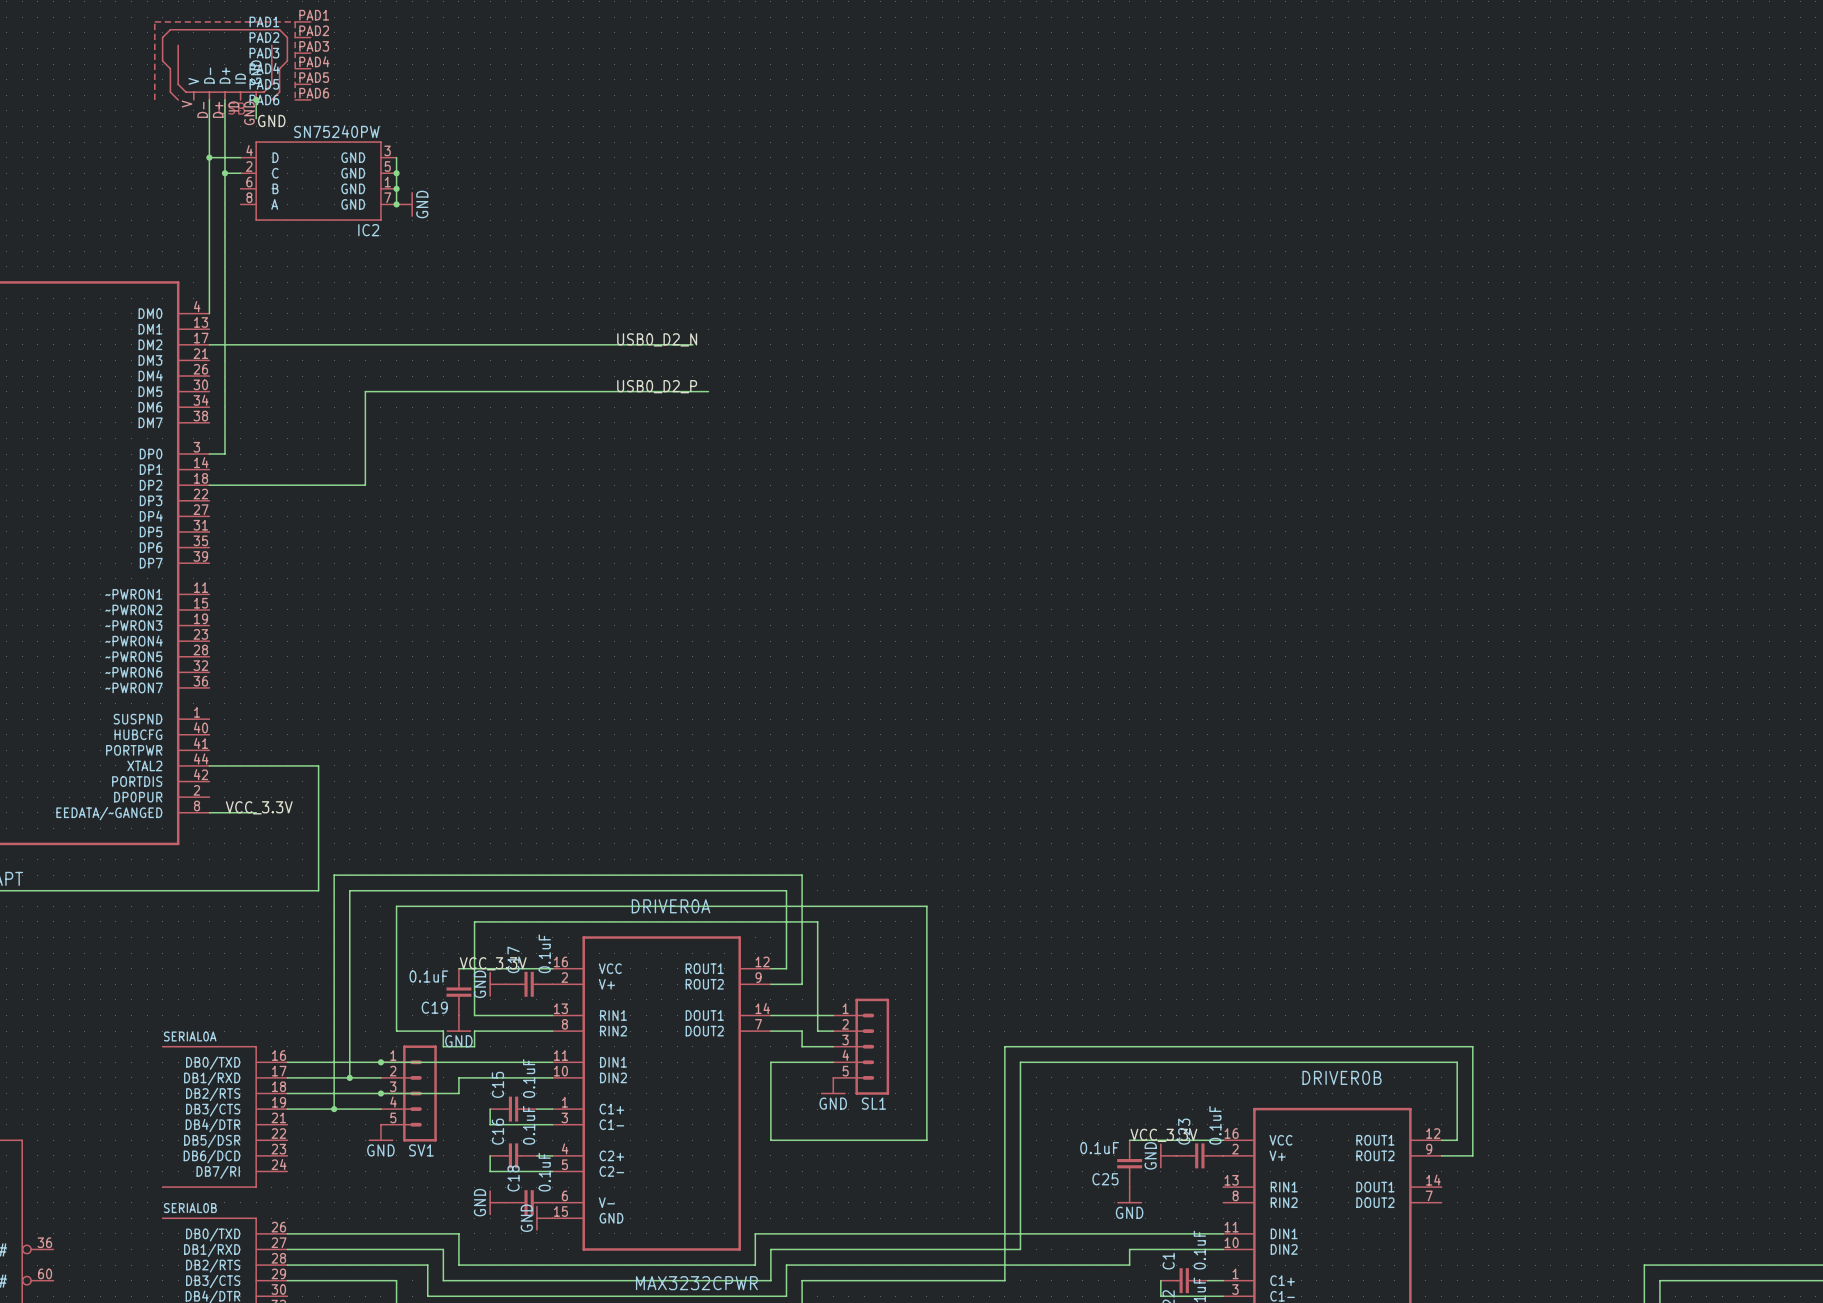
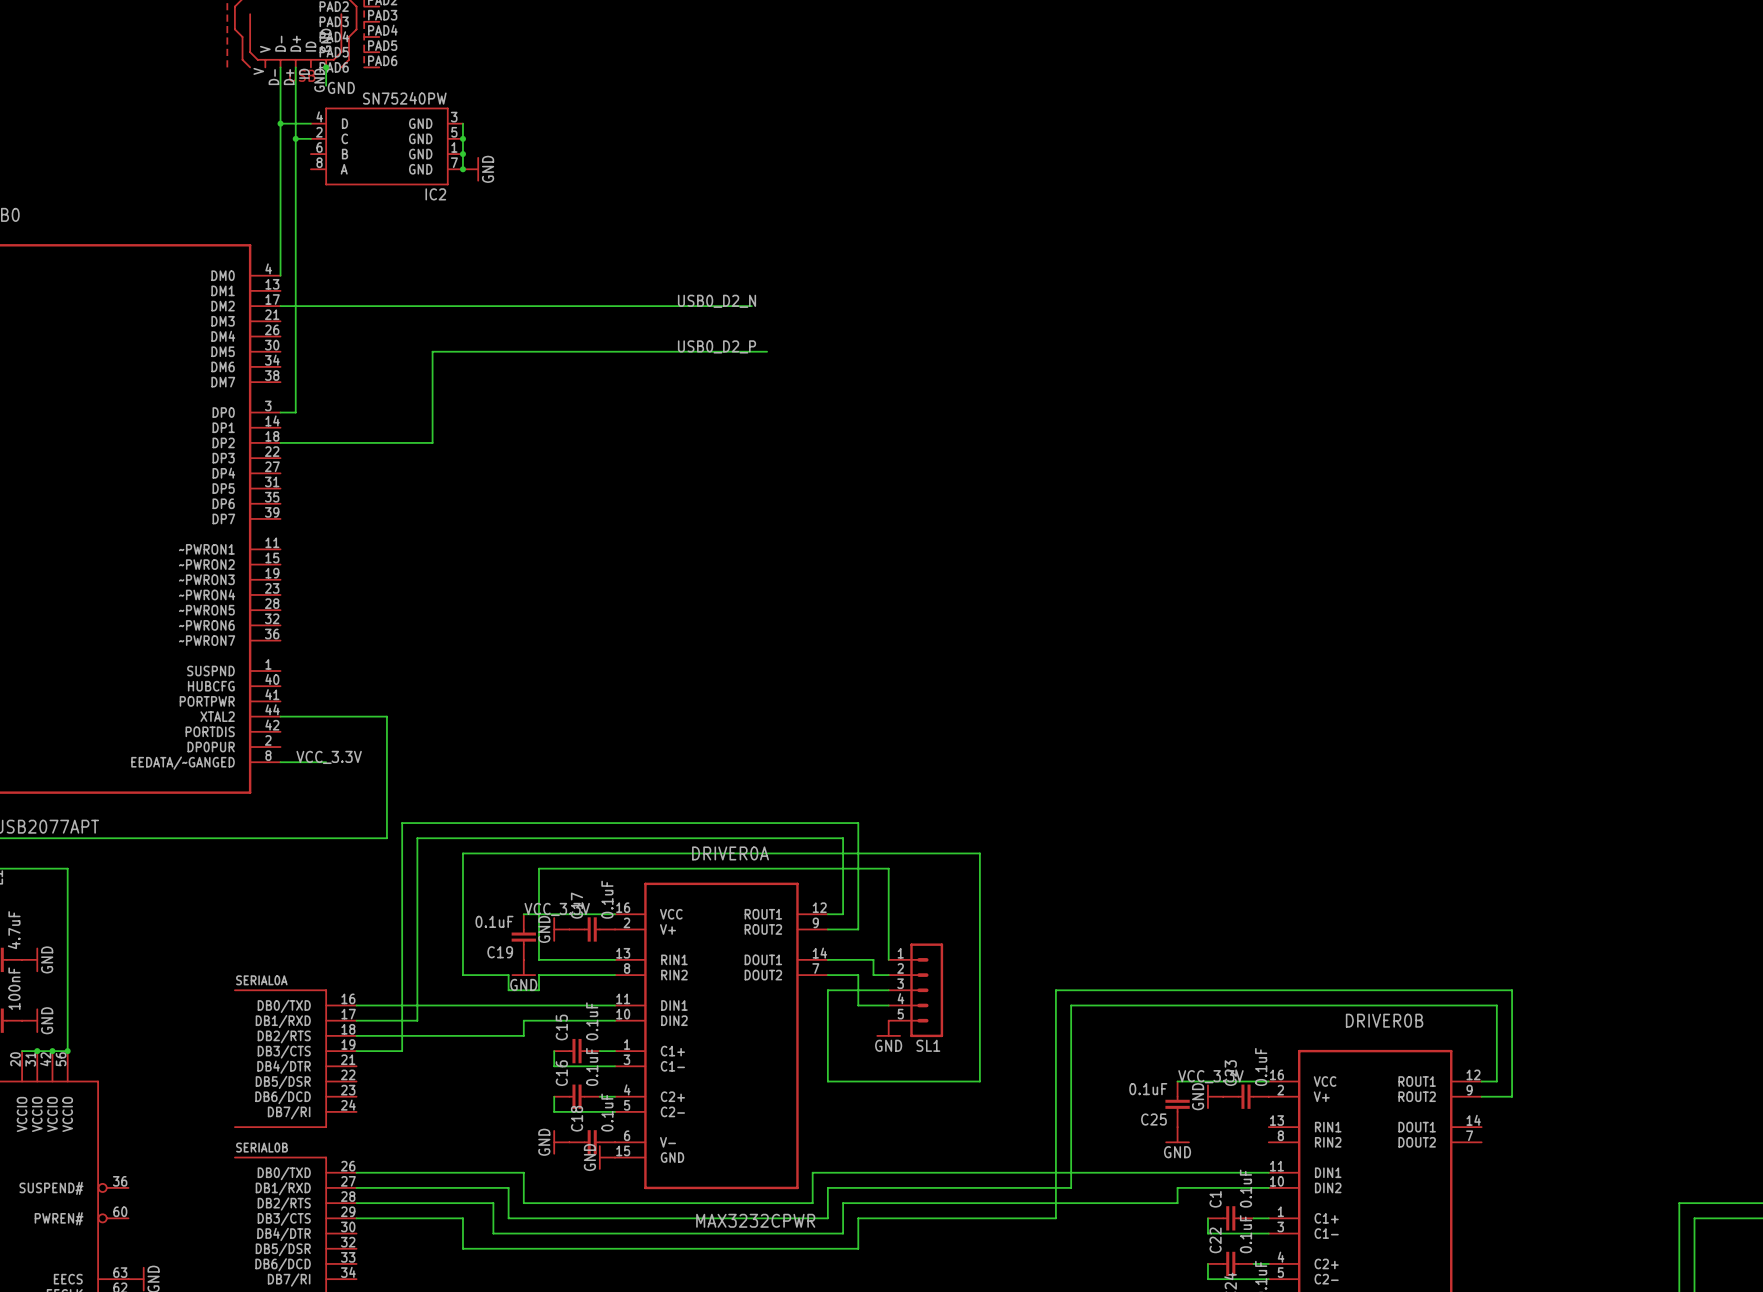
wire: (817, 921) (817, 1015) (833, 1015) -> (873, 868) (888, 868) (888, 959)
junction: (380, 1062) -> none
wire: (770, 1062) (802, 1062) -> (827, 1005) (827, 990) (858, 990) (858, 1005)
wire: (349, 1077) (380, 1077) -> none
junction: (349, 1077) -> none
junction: (380, 1093) -> none
SV1: (408, 1093) -> none
wire: (334, 1109) (380, 1109) -> none
junction: (334, 1109) -> none
power symbol: GND (380, 1132) -> none

